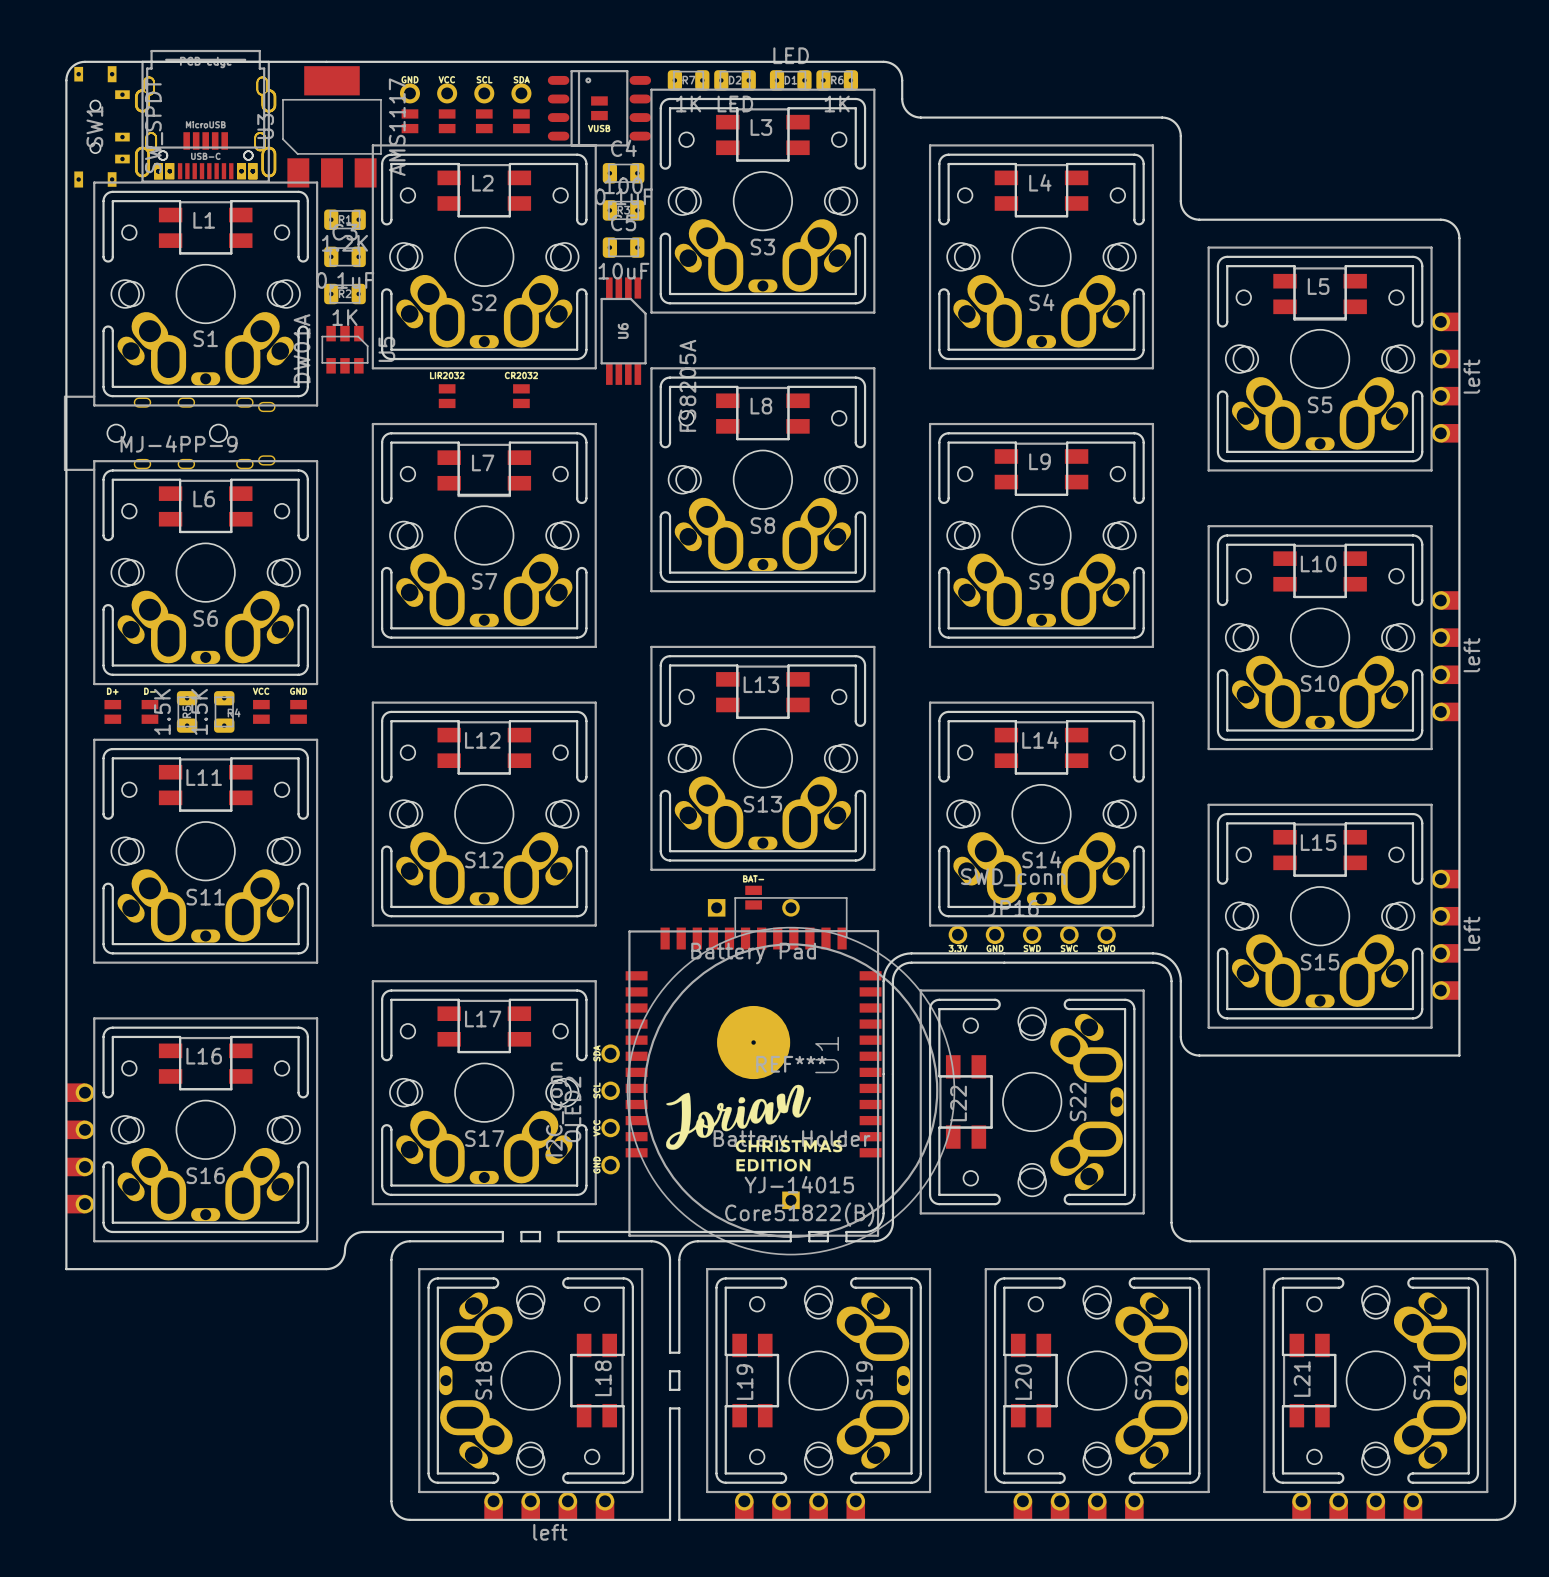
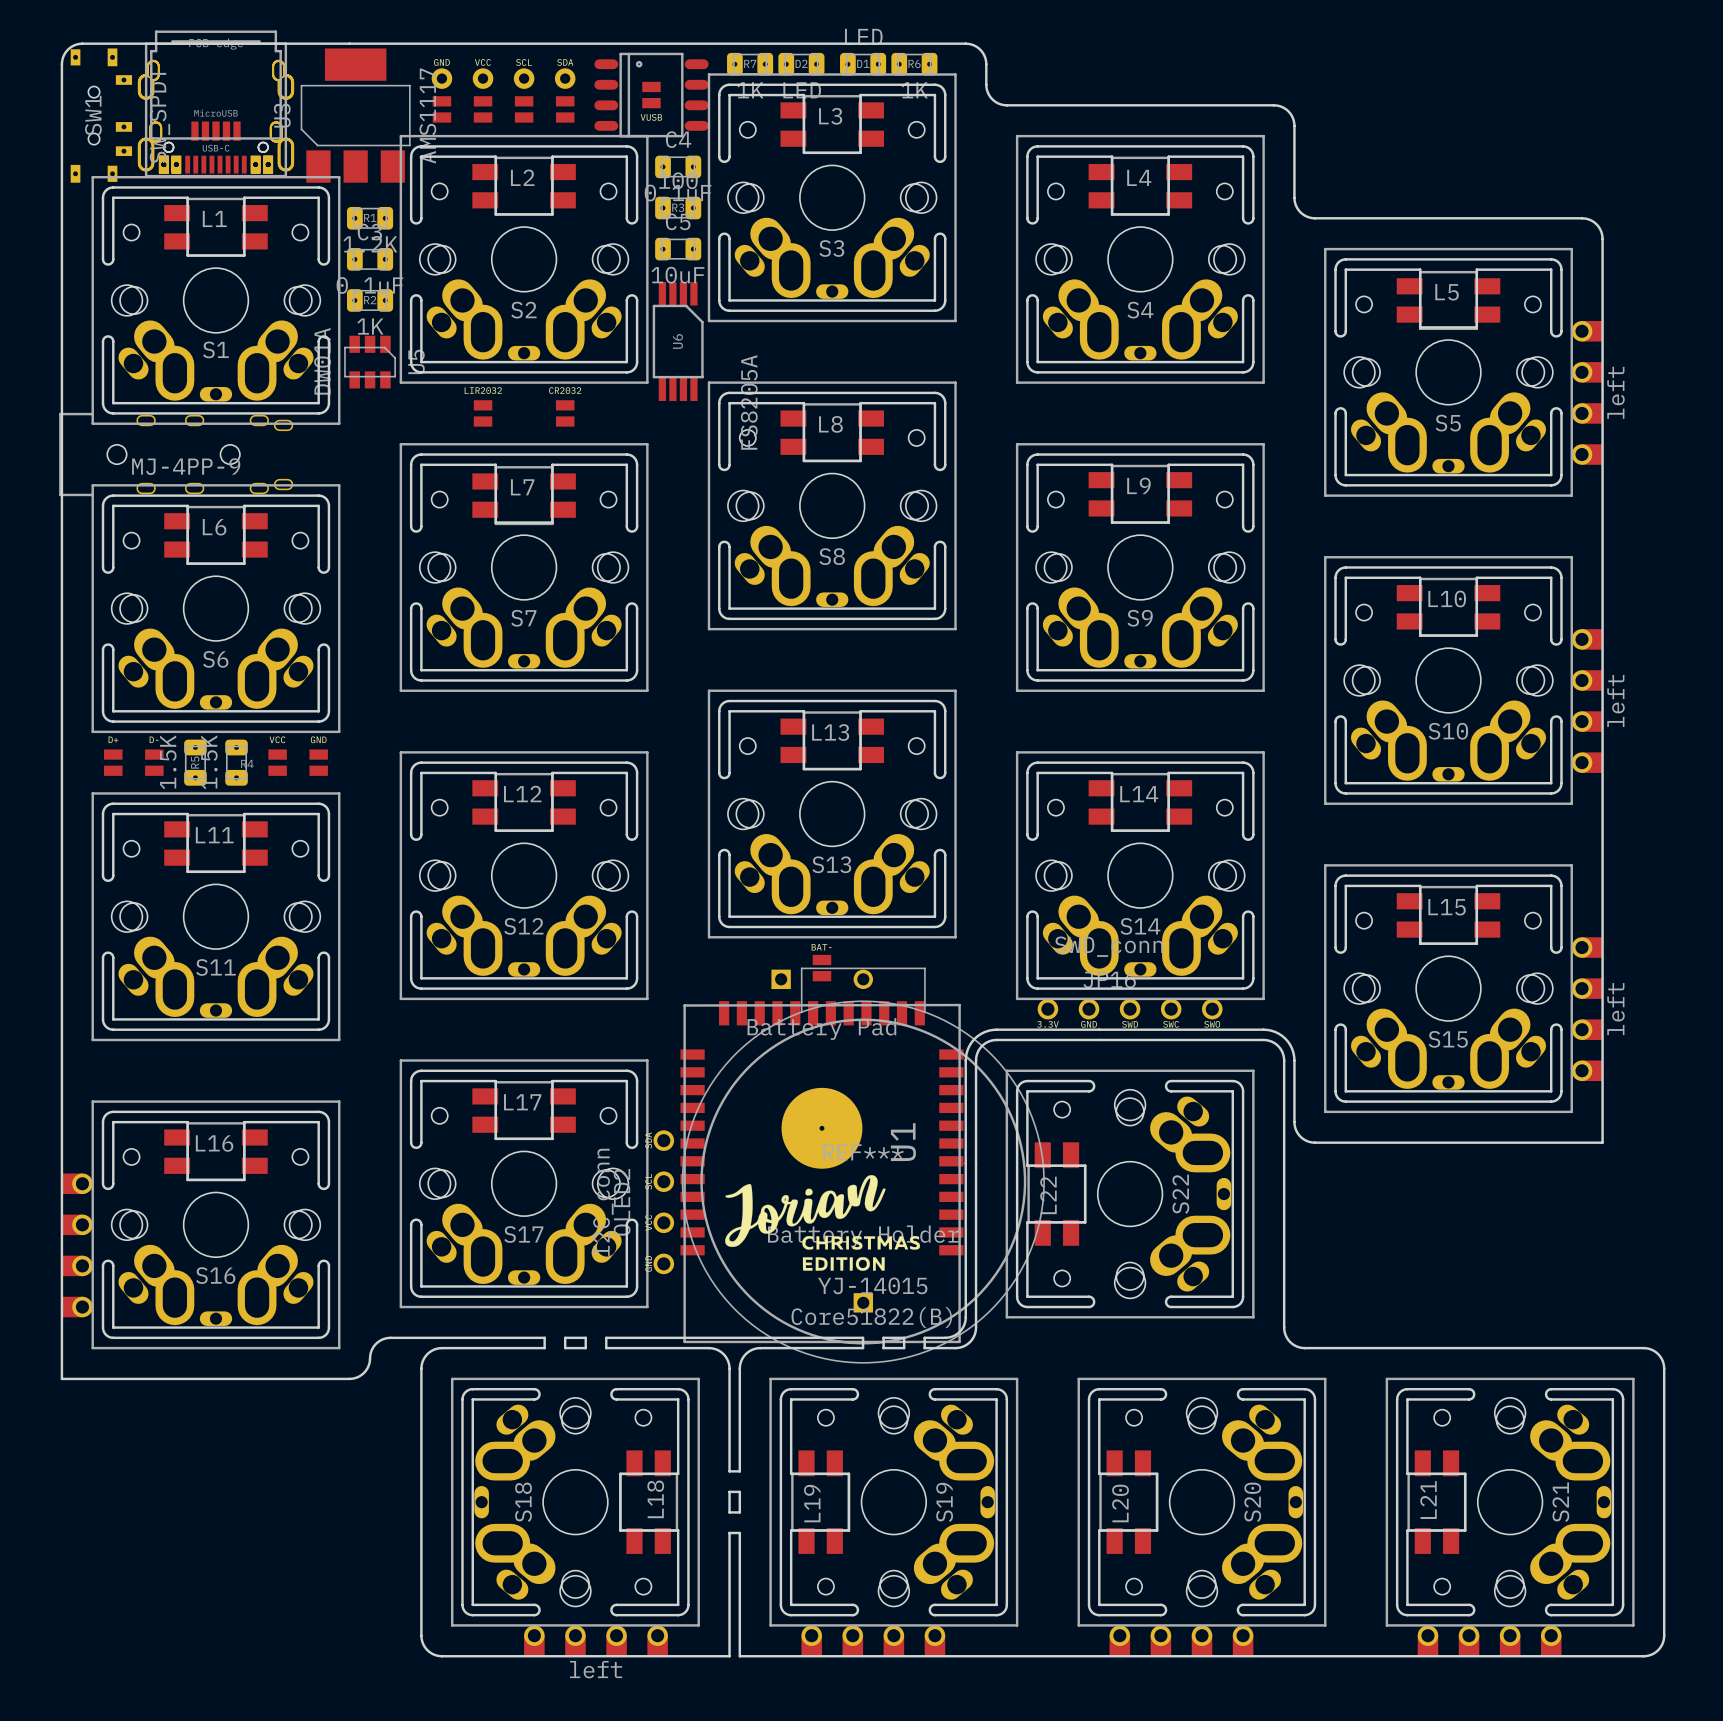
part footprint: [399, 83, 532, 104] -> [431, 68, 576, 89]

